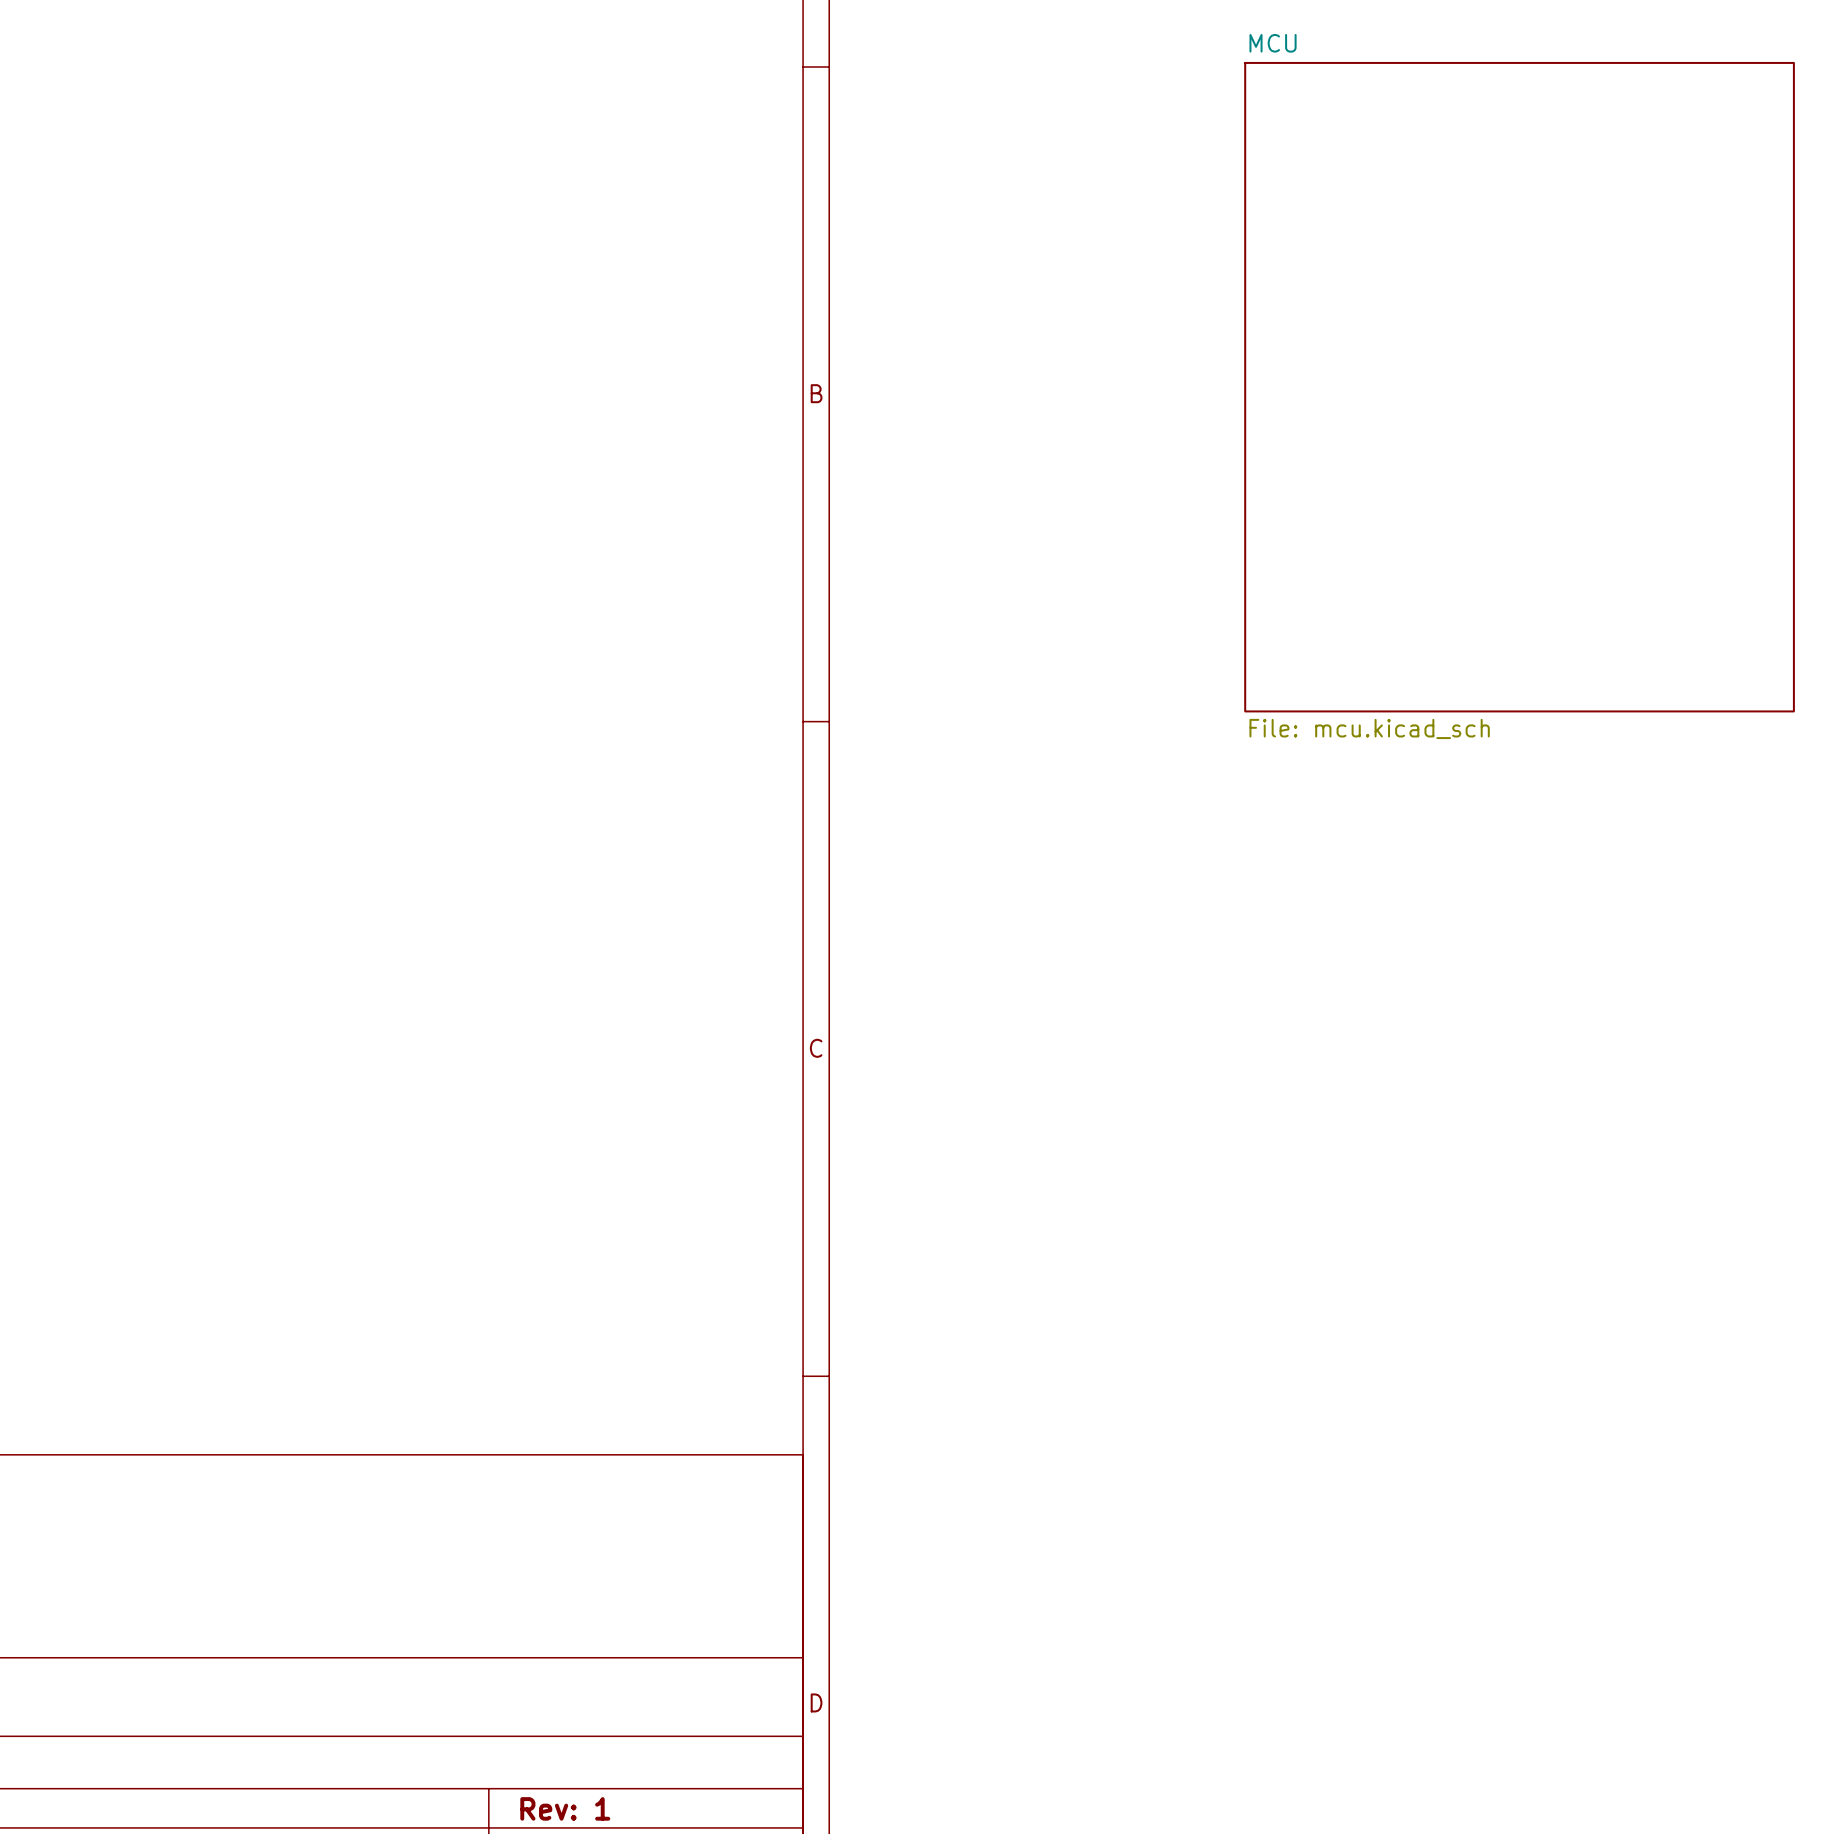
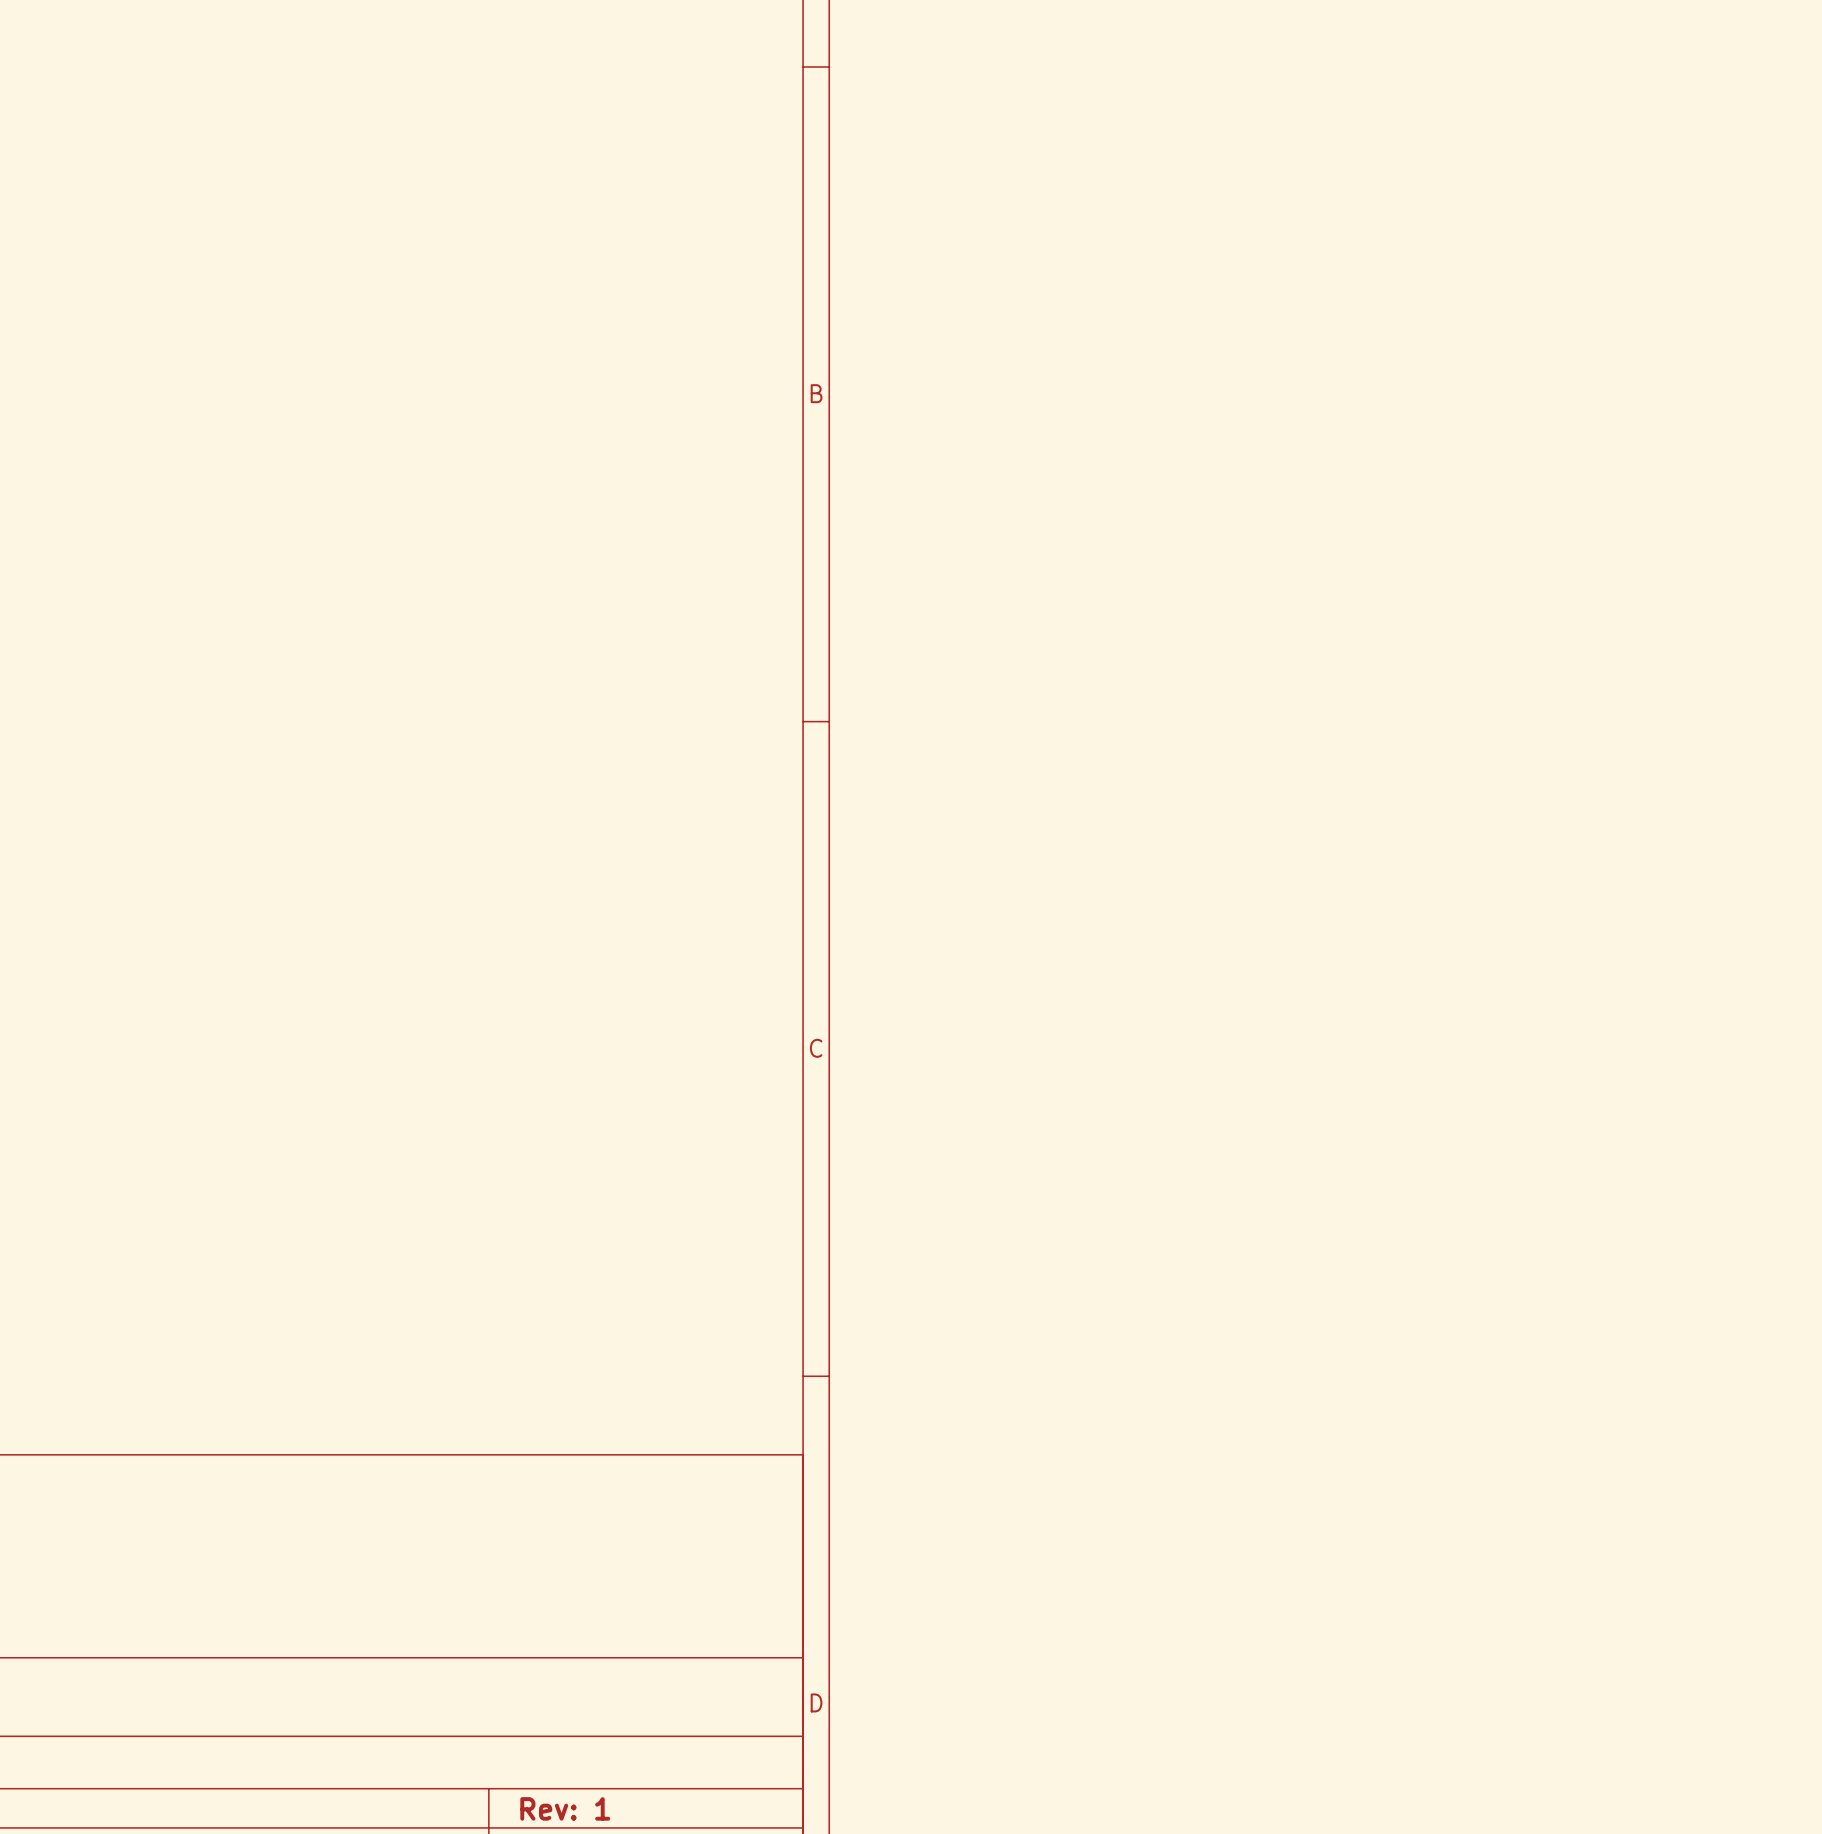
sheet MCU: File: mcu.kicad_sch (1519, 387) -> none

